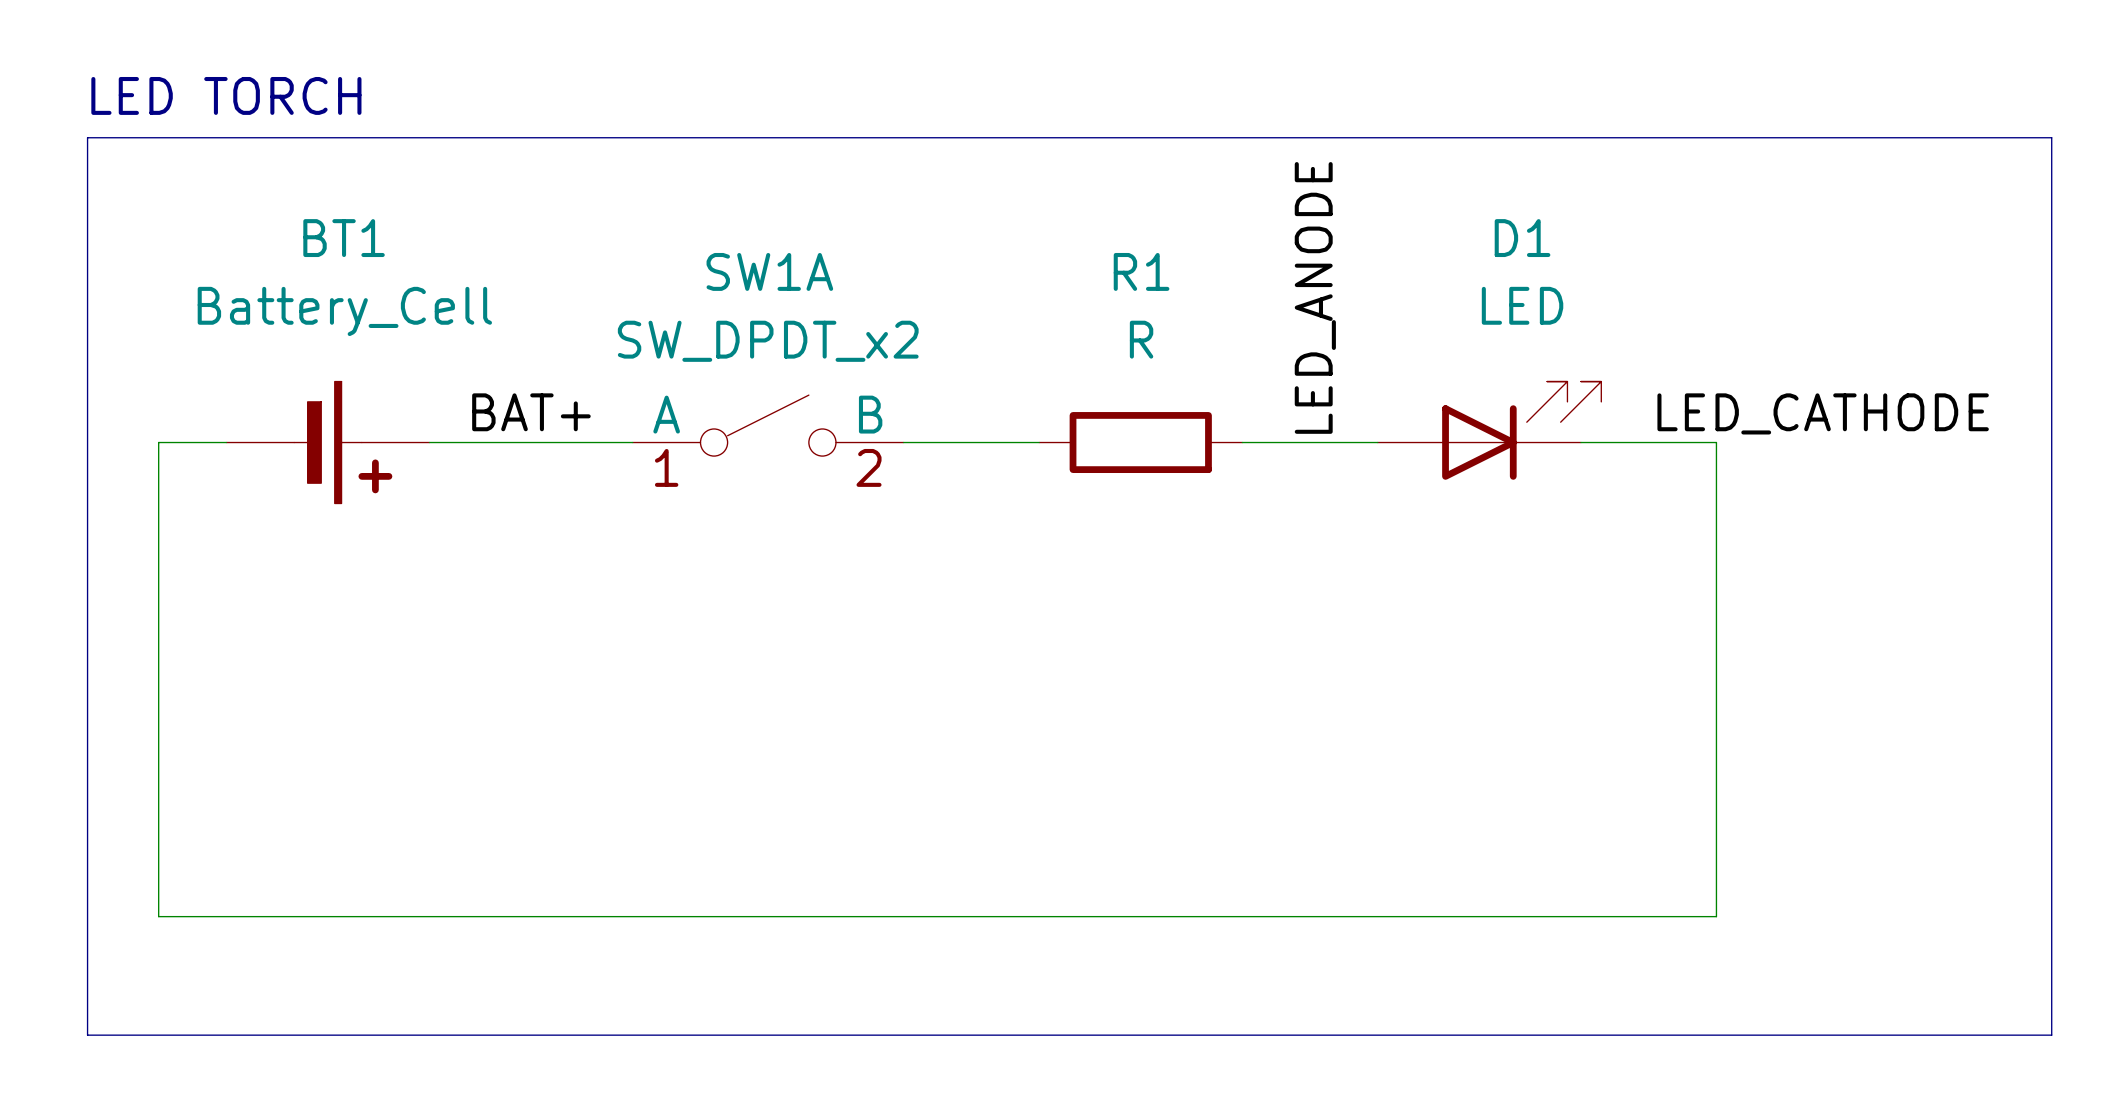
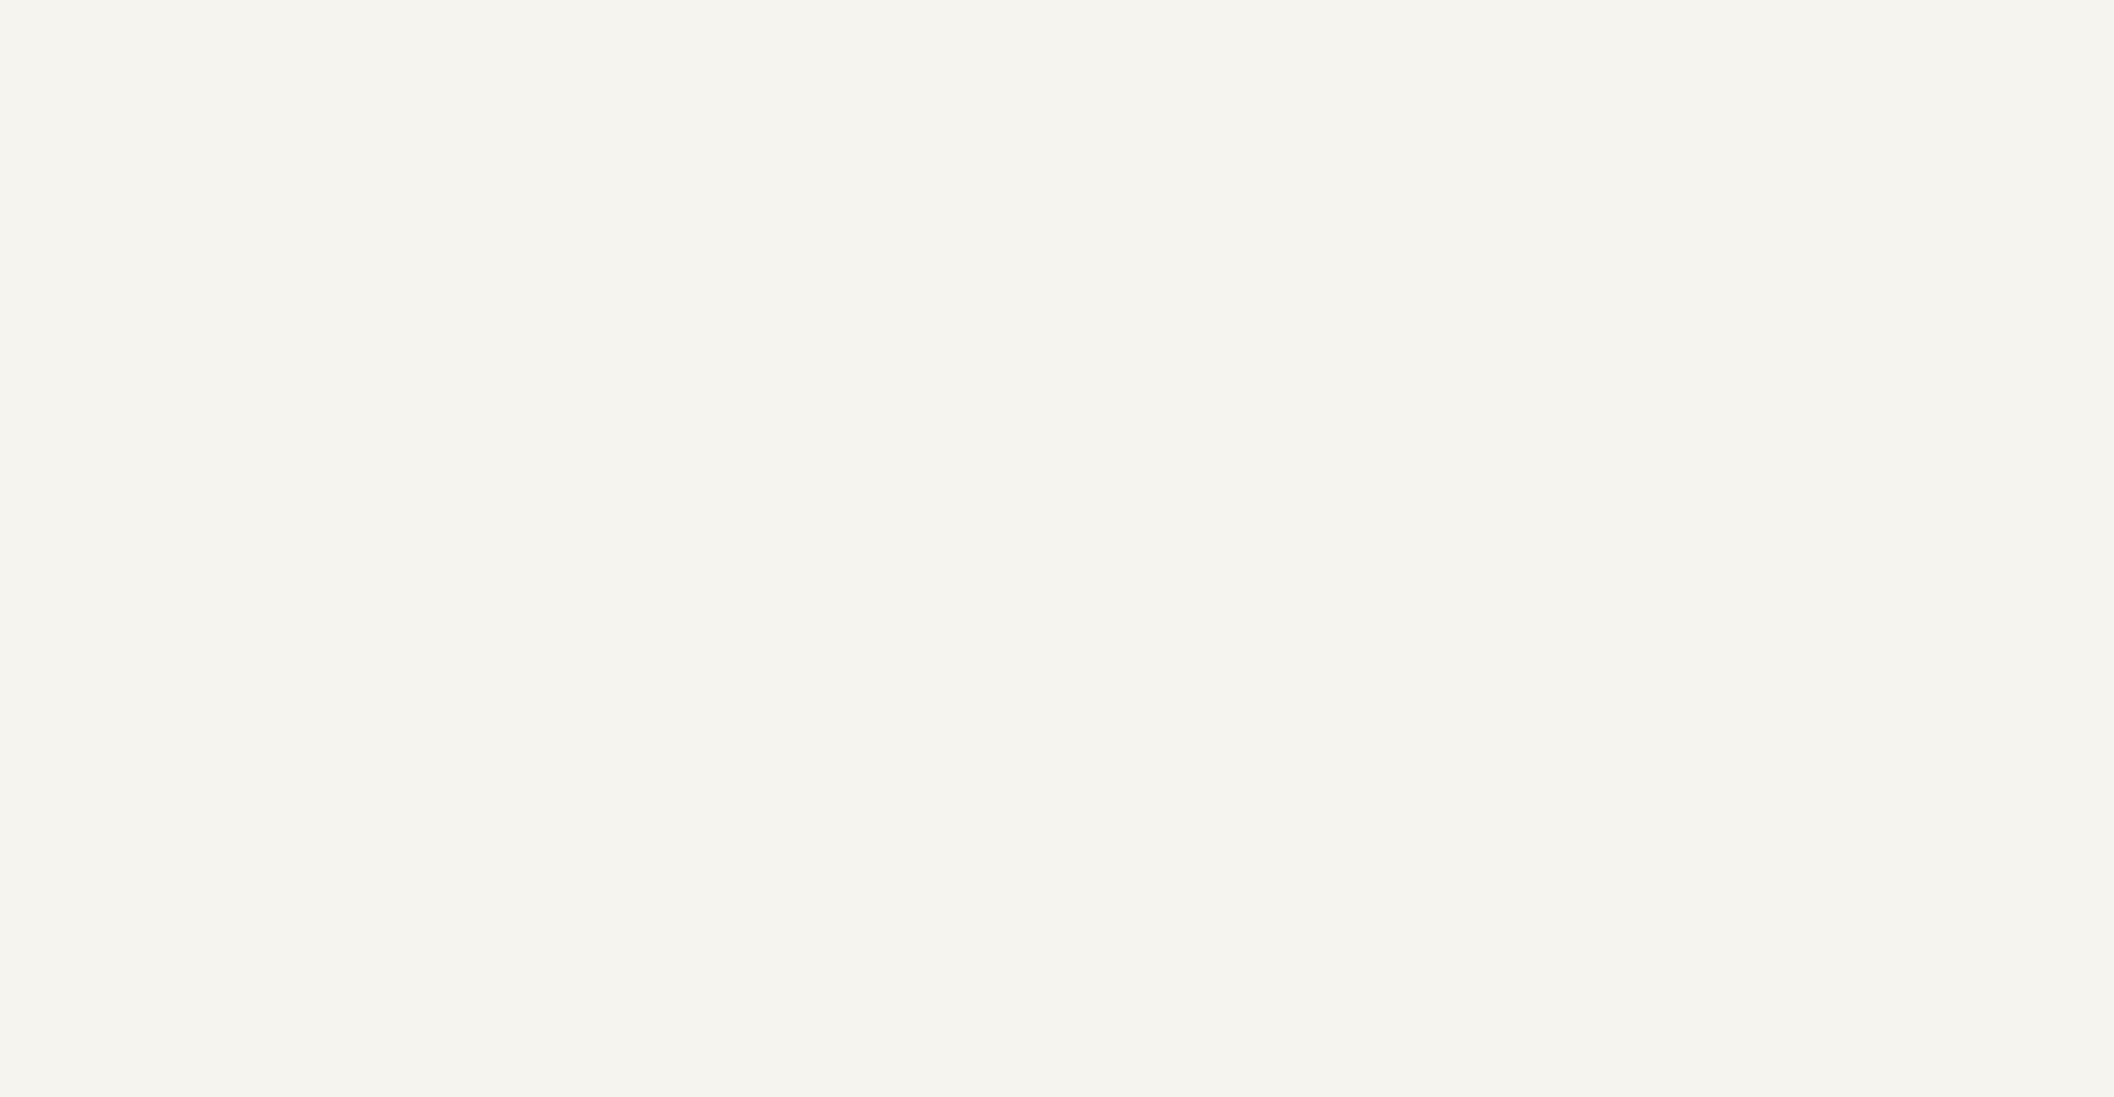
text: LED TORCH (226, 95) -> none
line: (87, 137) (2051, 137) (2051, 1035) (87, 1035) (87, 137) -> none
label: LED_ANODE (1315, 297) -> none
label: BAT+ (531, 412) -> none
label: LED_CATHODE (1823, 413) -> none
SW1A: SW_DPDT_x2 (768, 425) -> none
D1: LED (1489, 430) -> none
wire: (226, 442) (158, 442) (158, 916) (1716, 916) (1716, 442) (1580, 442) -> none
BT1: Battery_Cell (328, 442) -> none
wire: (429, 442) (632, 442) -> none
wire: (903, 442) (1039, 442) -> none
R1: R (1140, 442) -> none
wire: (1242, 442) (1377, 442) -> none

